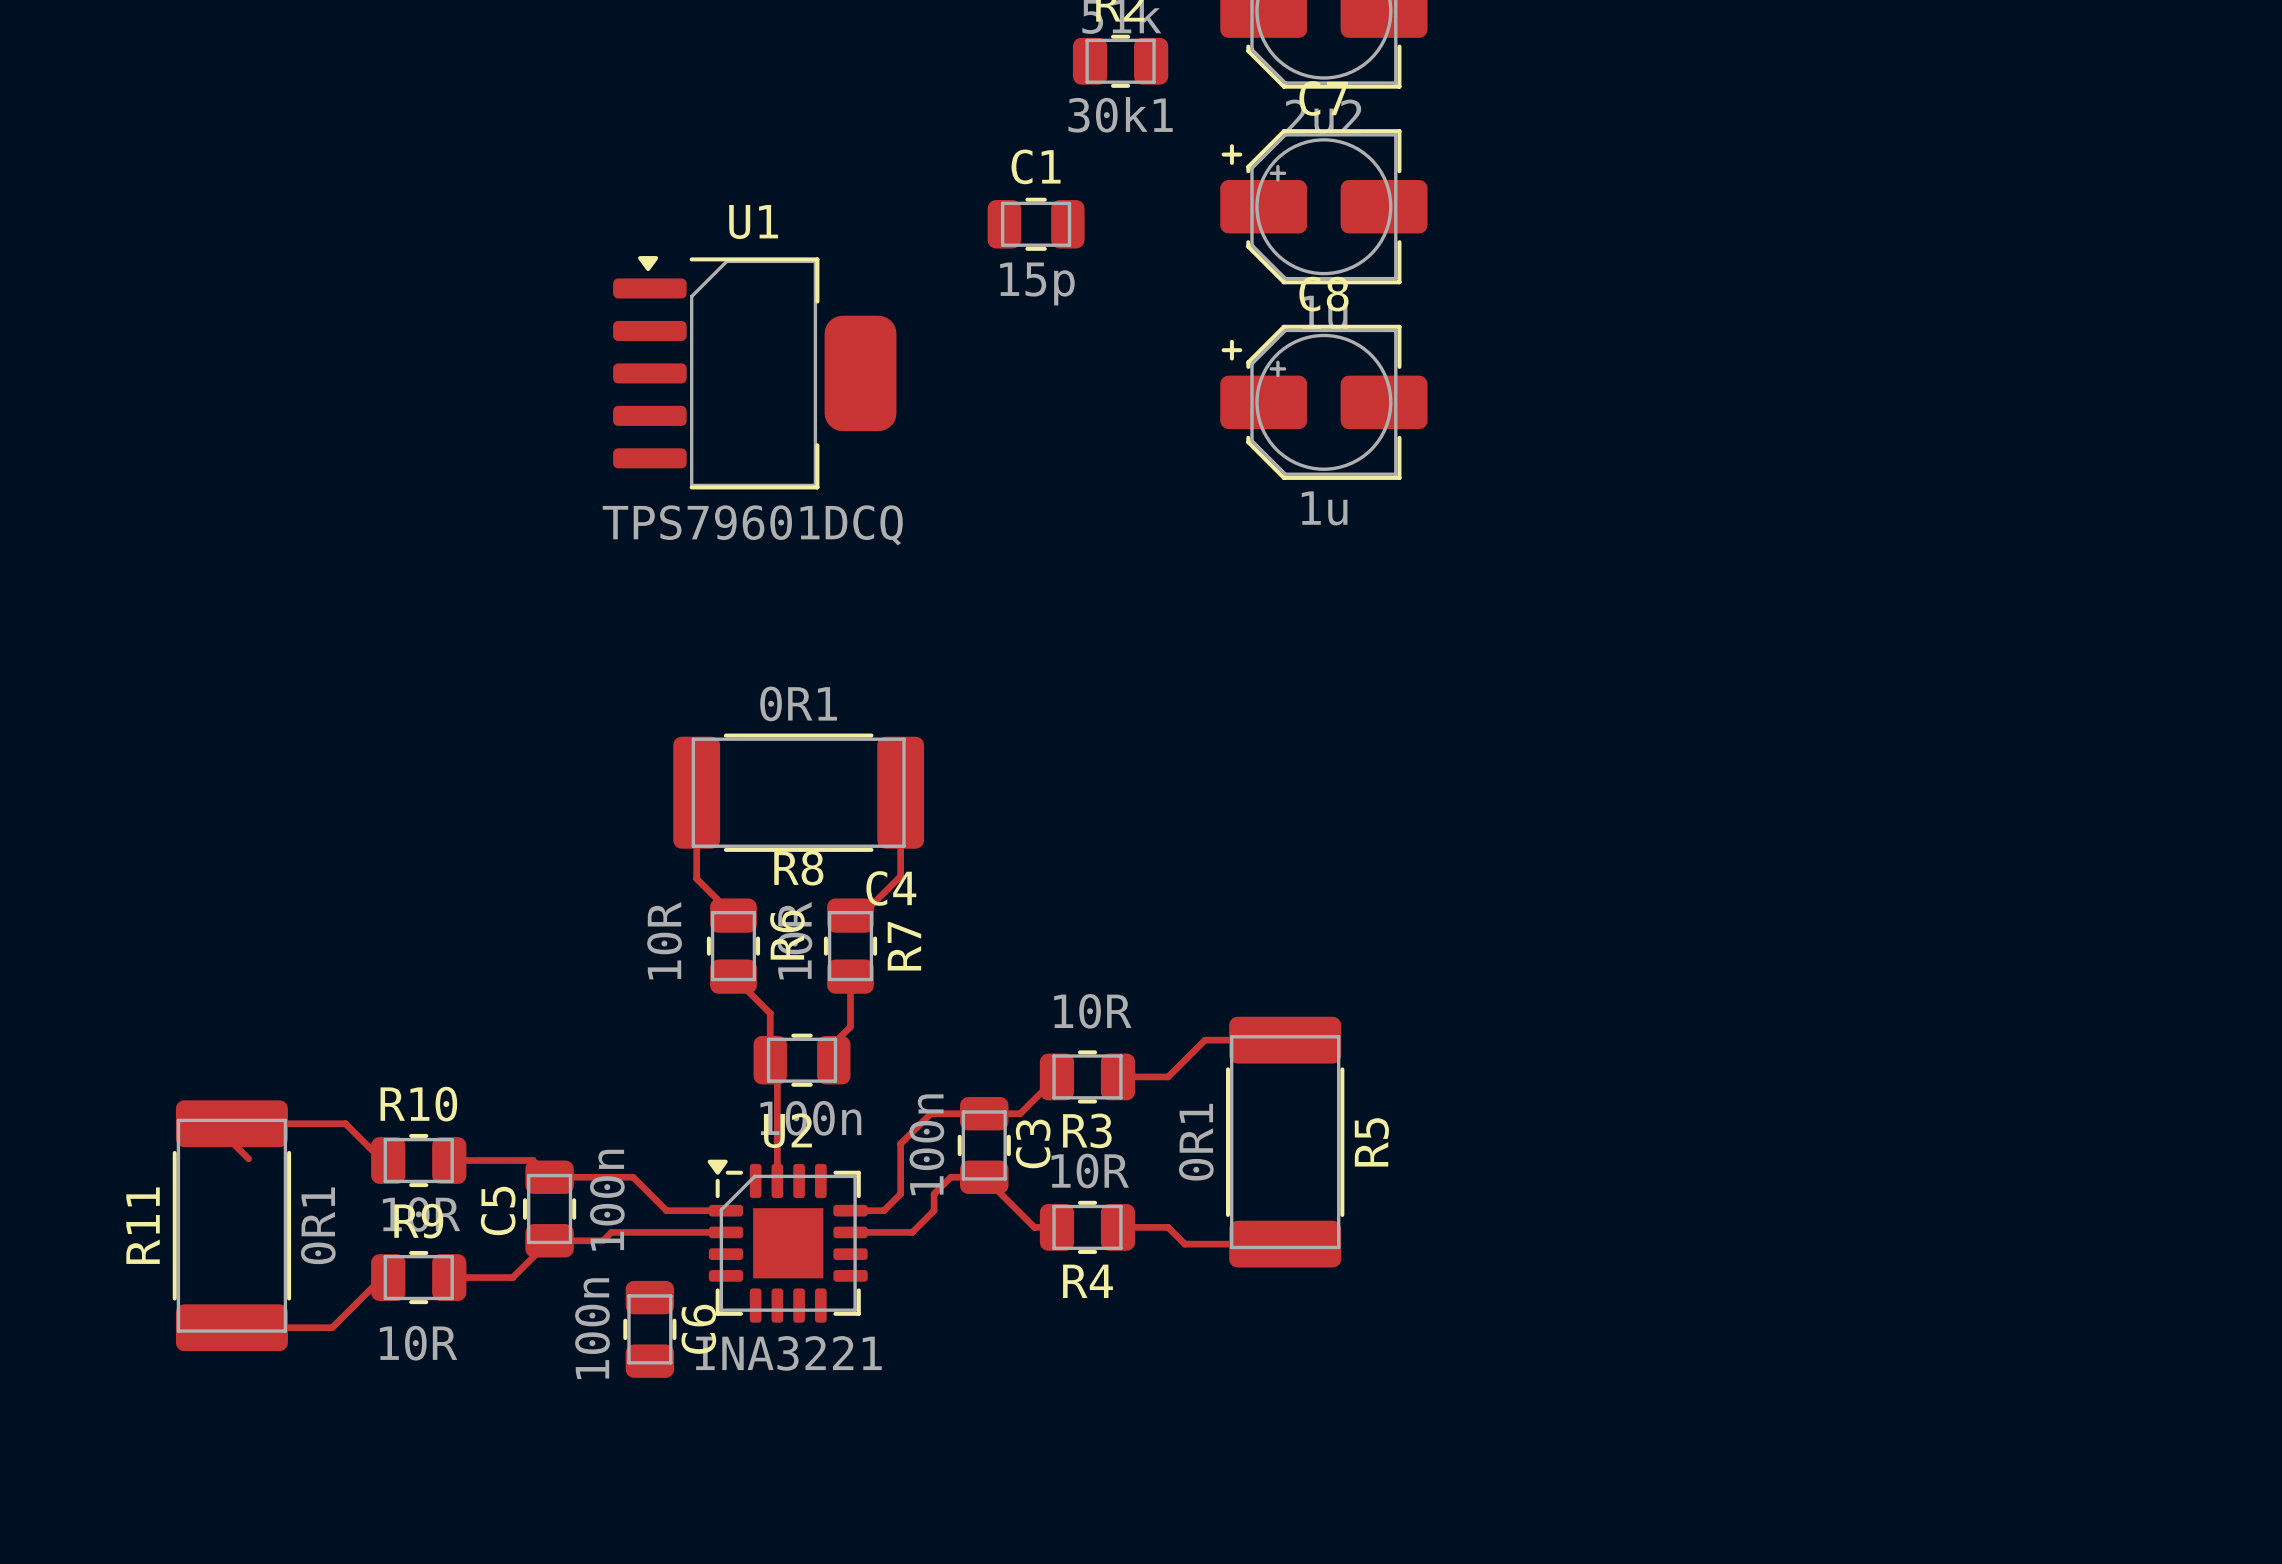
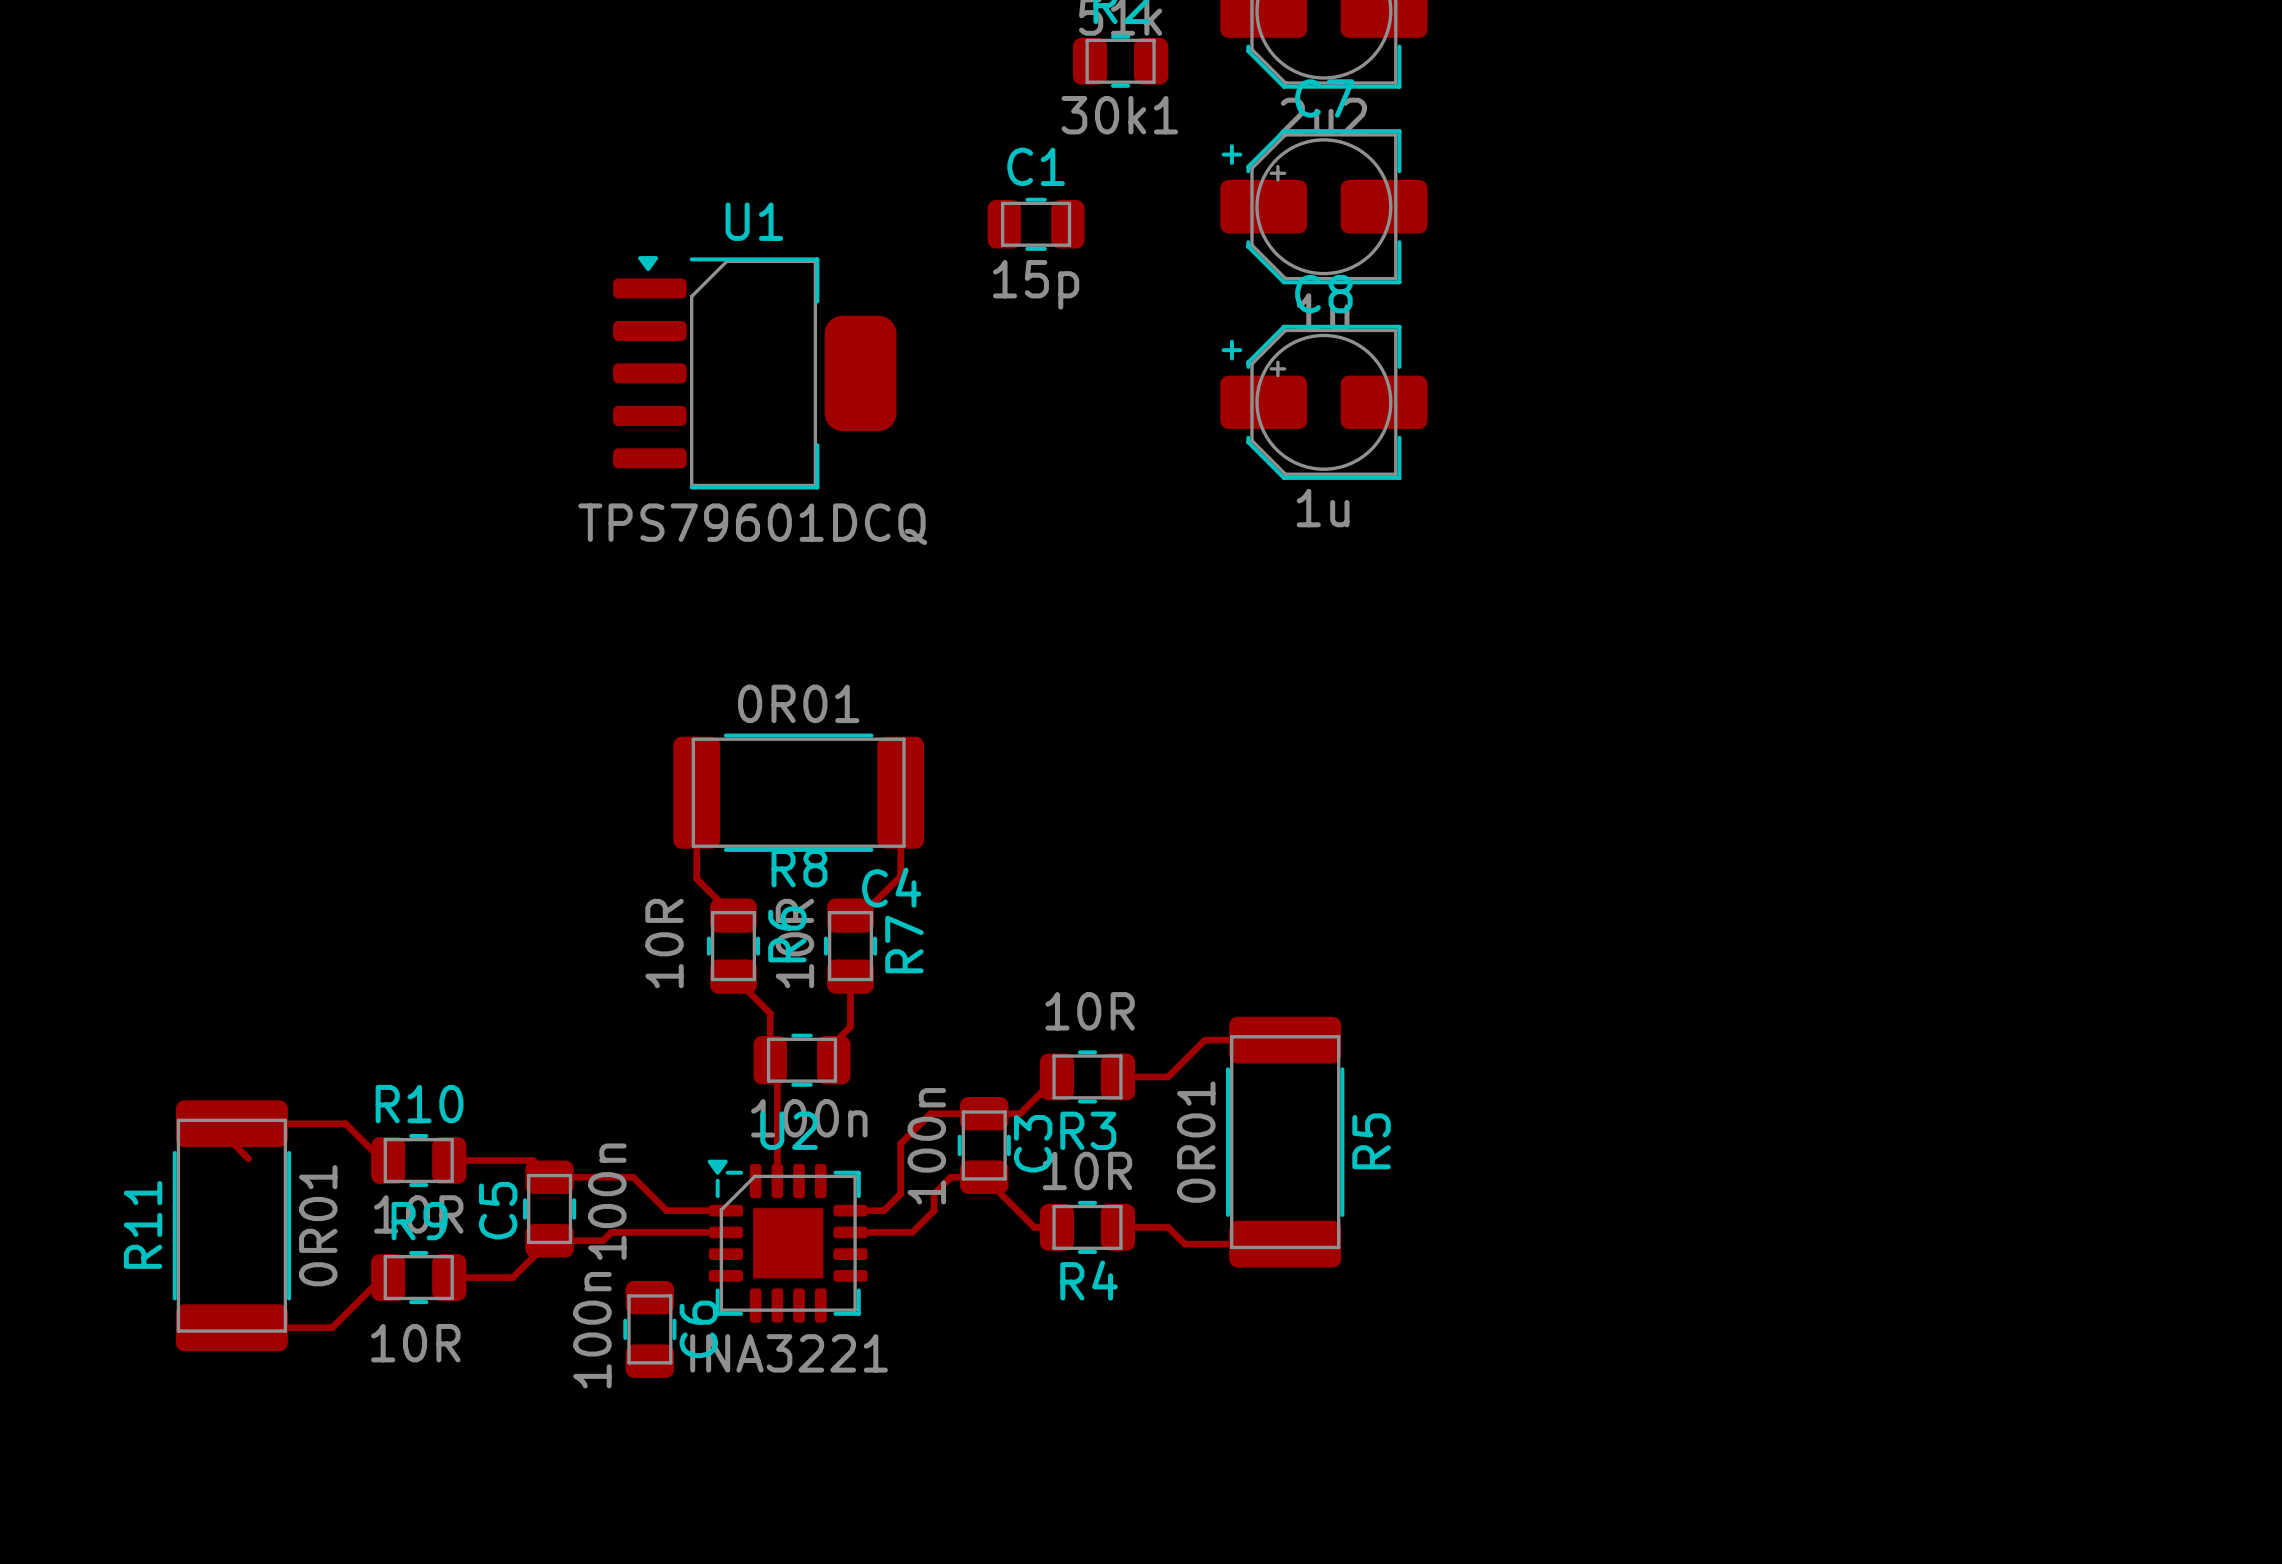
R8 value: 0R1 (798, 703) -> 0R01 (798, 703)
R5 value: 0R1 (1196, 1142) -> 0R01 (1196, 1142)
R11 value: 0R1 (318, 1225) -> 0R01 (318, 1225)

